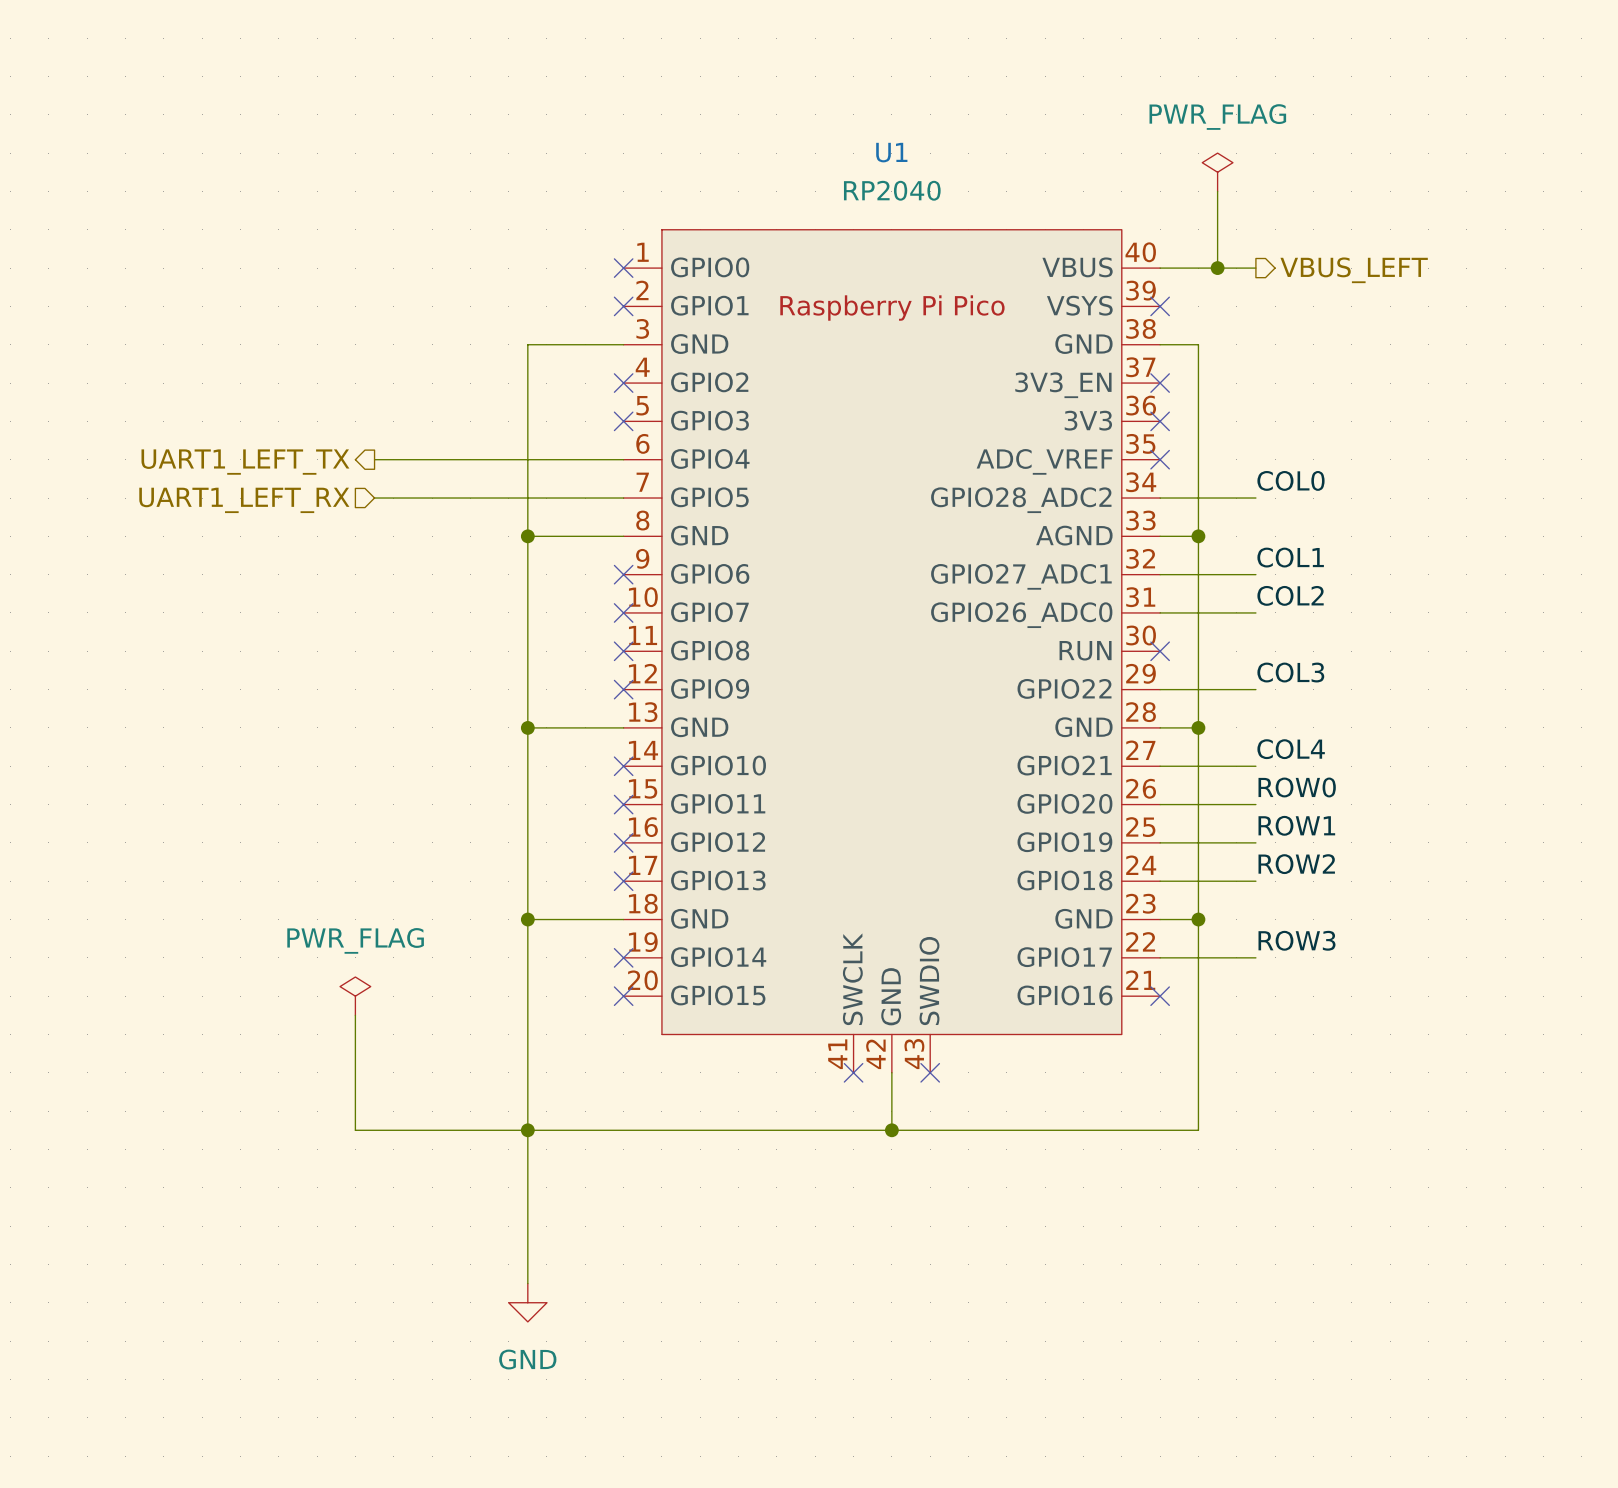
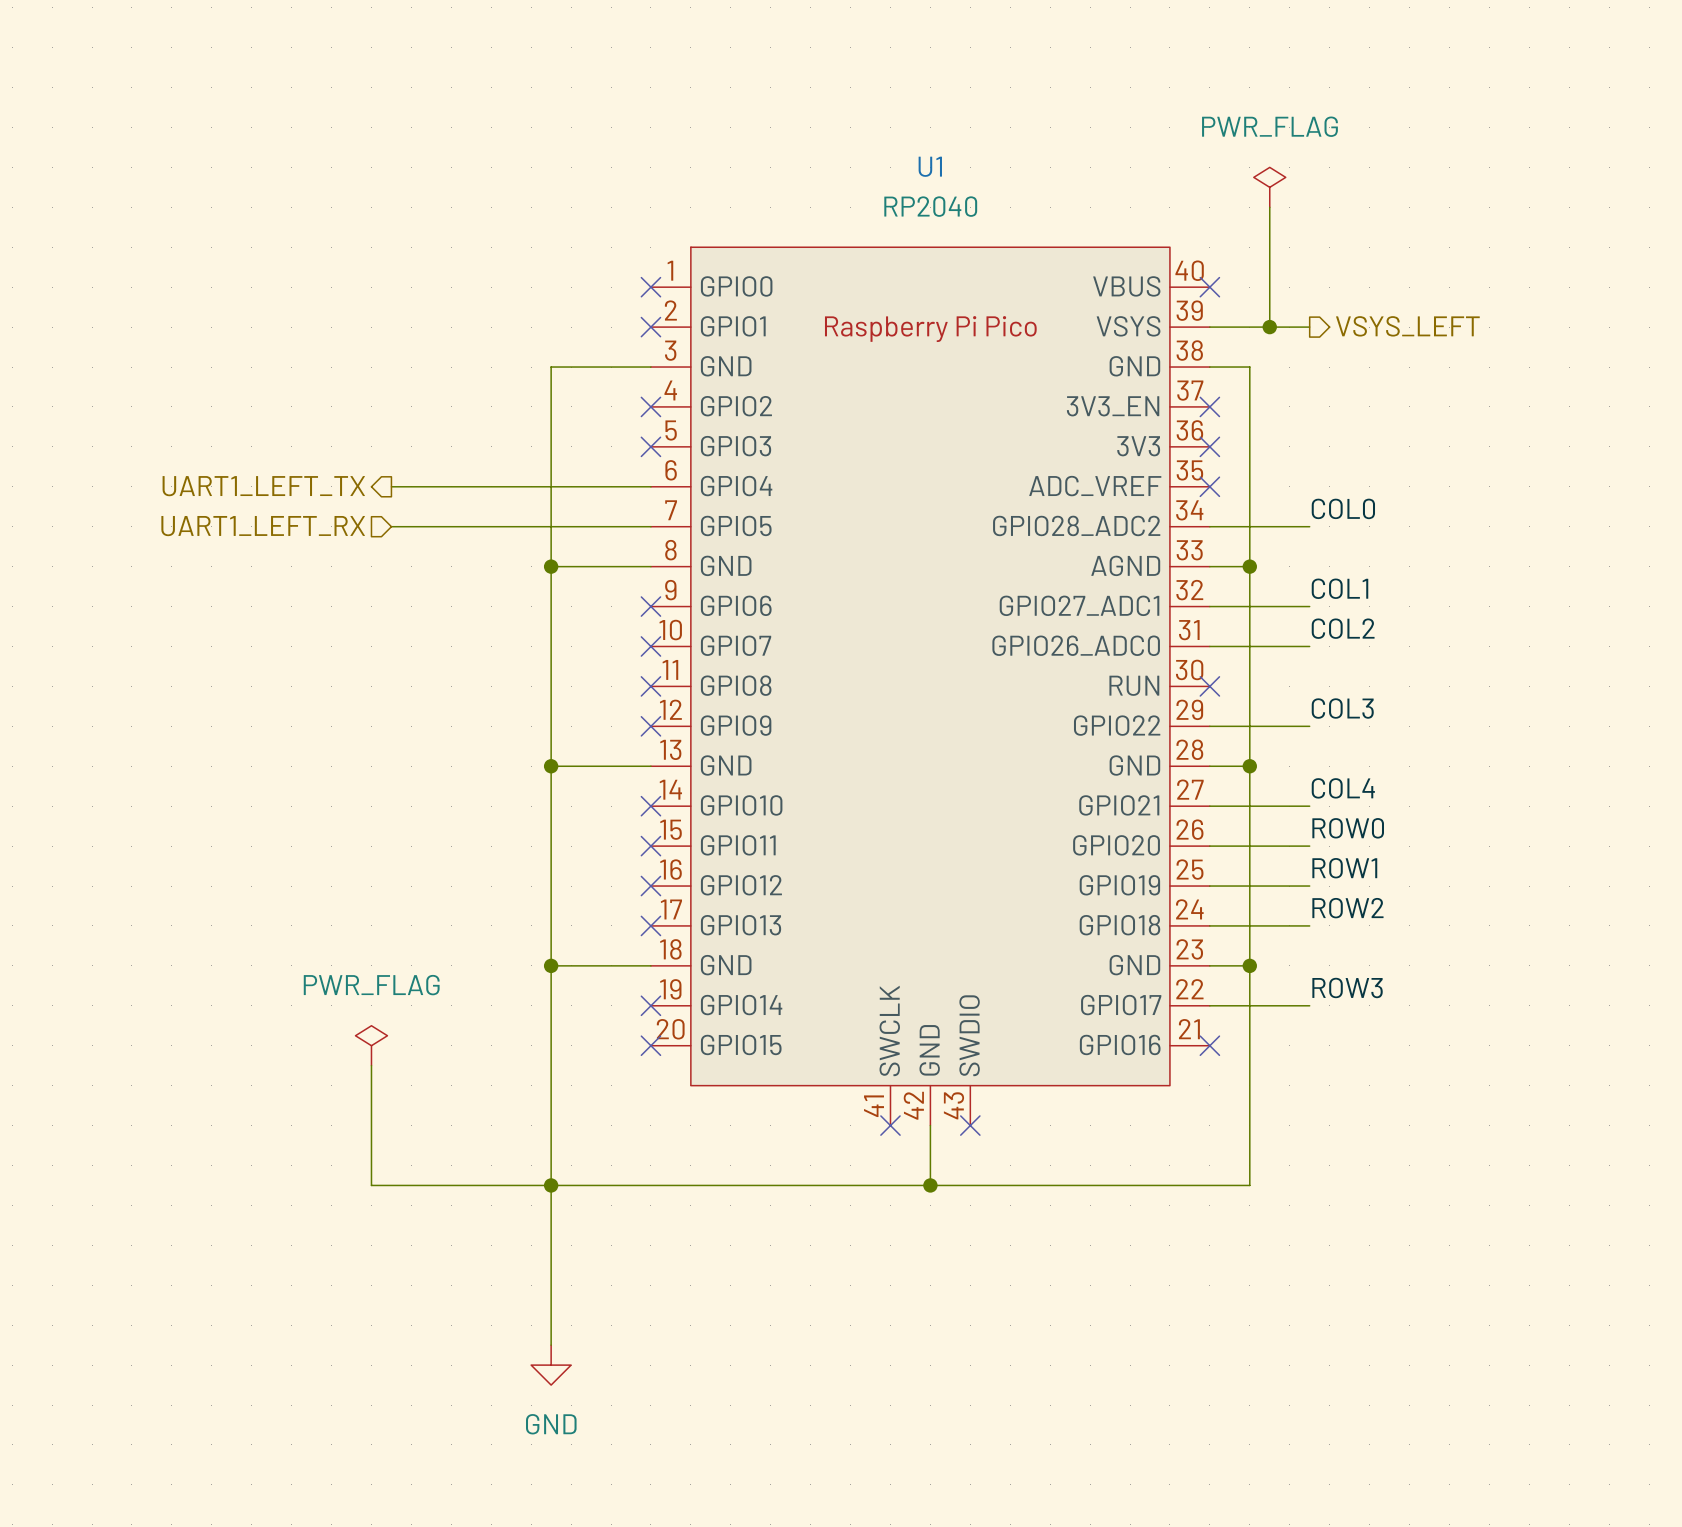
wire: (1160, 268) (1255, 268) -> (1209, 327) (1309, 327)
wire: none -> (1269, 287) (1269, 327)
junction position: (1217, 268) -> (1269, 327)
hierarchical label: VBUS_LEFT (1354, 270) -> VSYS_LEFT (1407, 326)
no-connect mark position: (1160, 306) -> (1209, 287)

